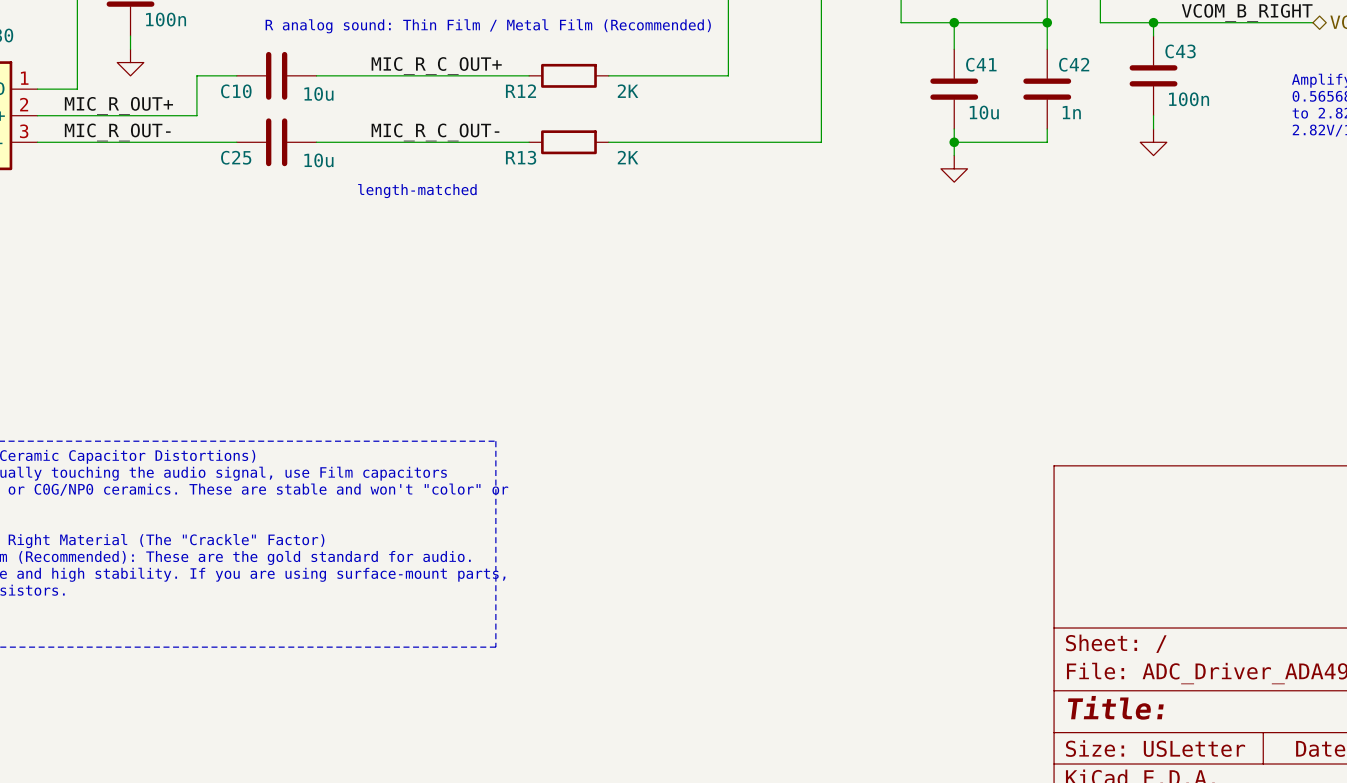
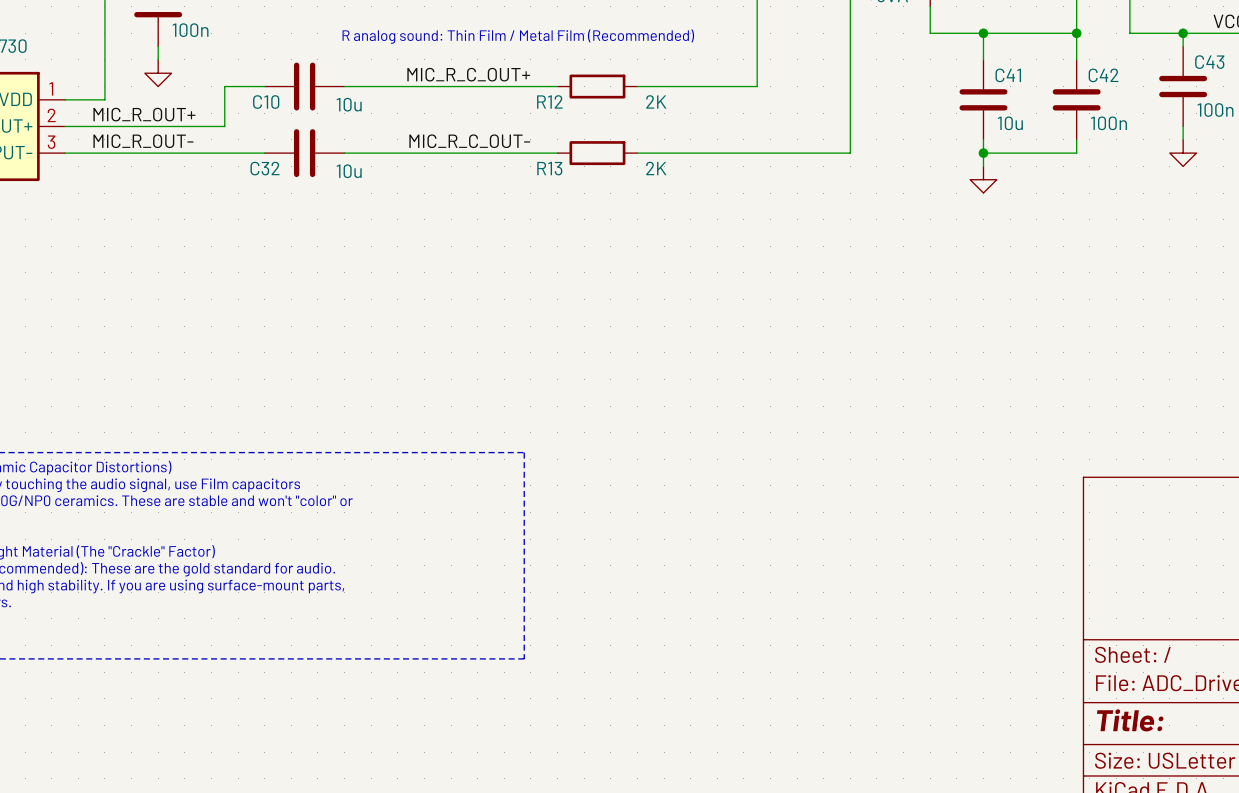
C42 value: 1n (1071, 112) -> 100n (1109, 123)
C25 name: C25 (236, 157) -> C32 (265, 168)
text: length-matched (417, 191) -> none

